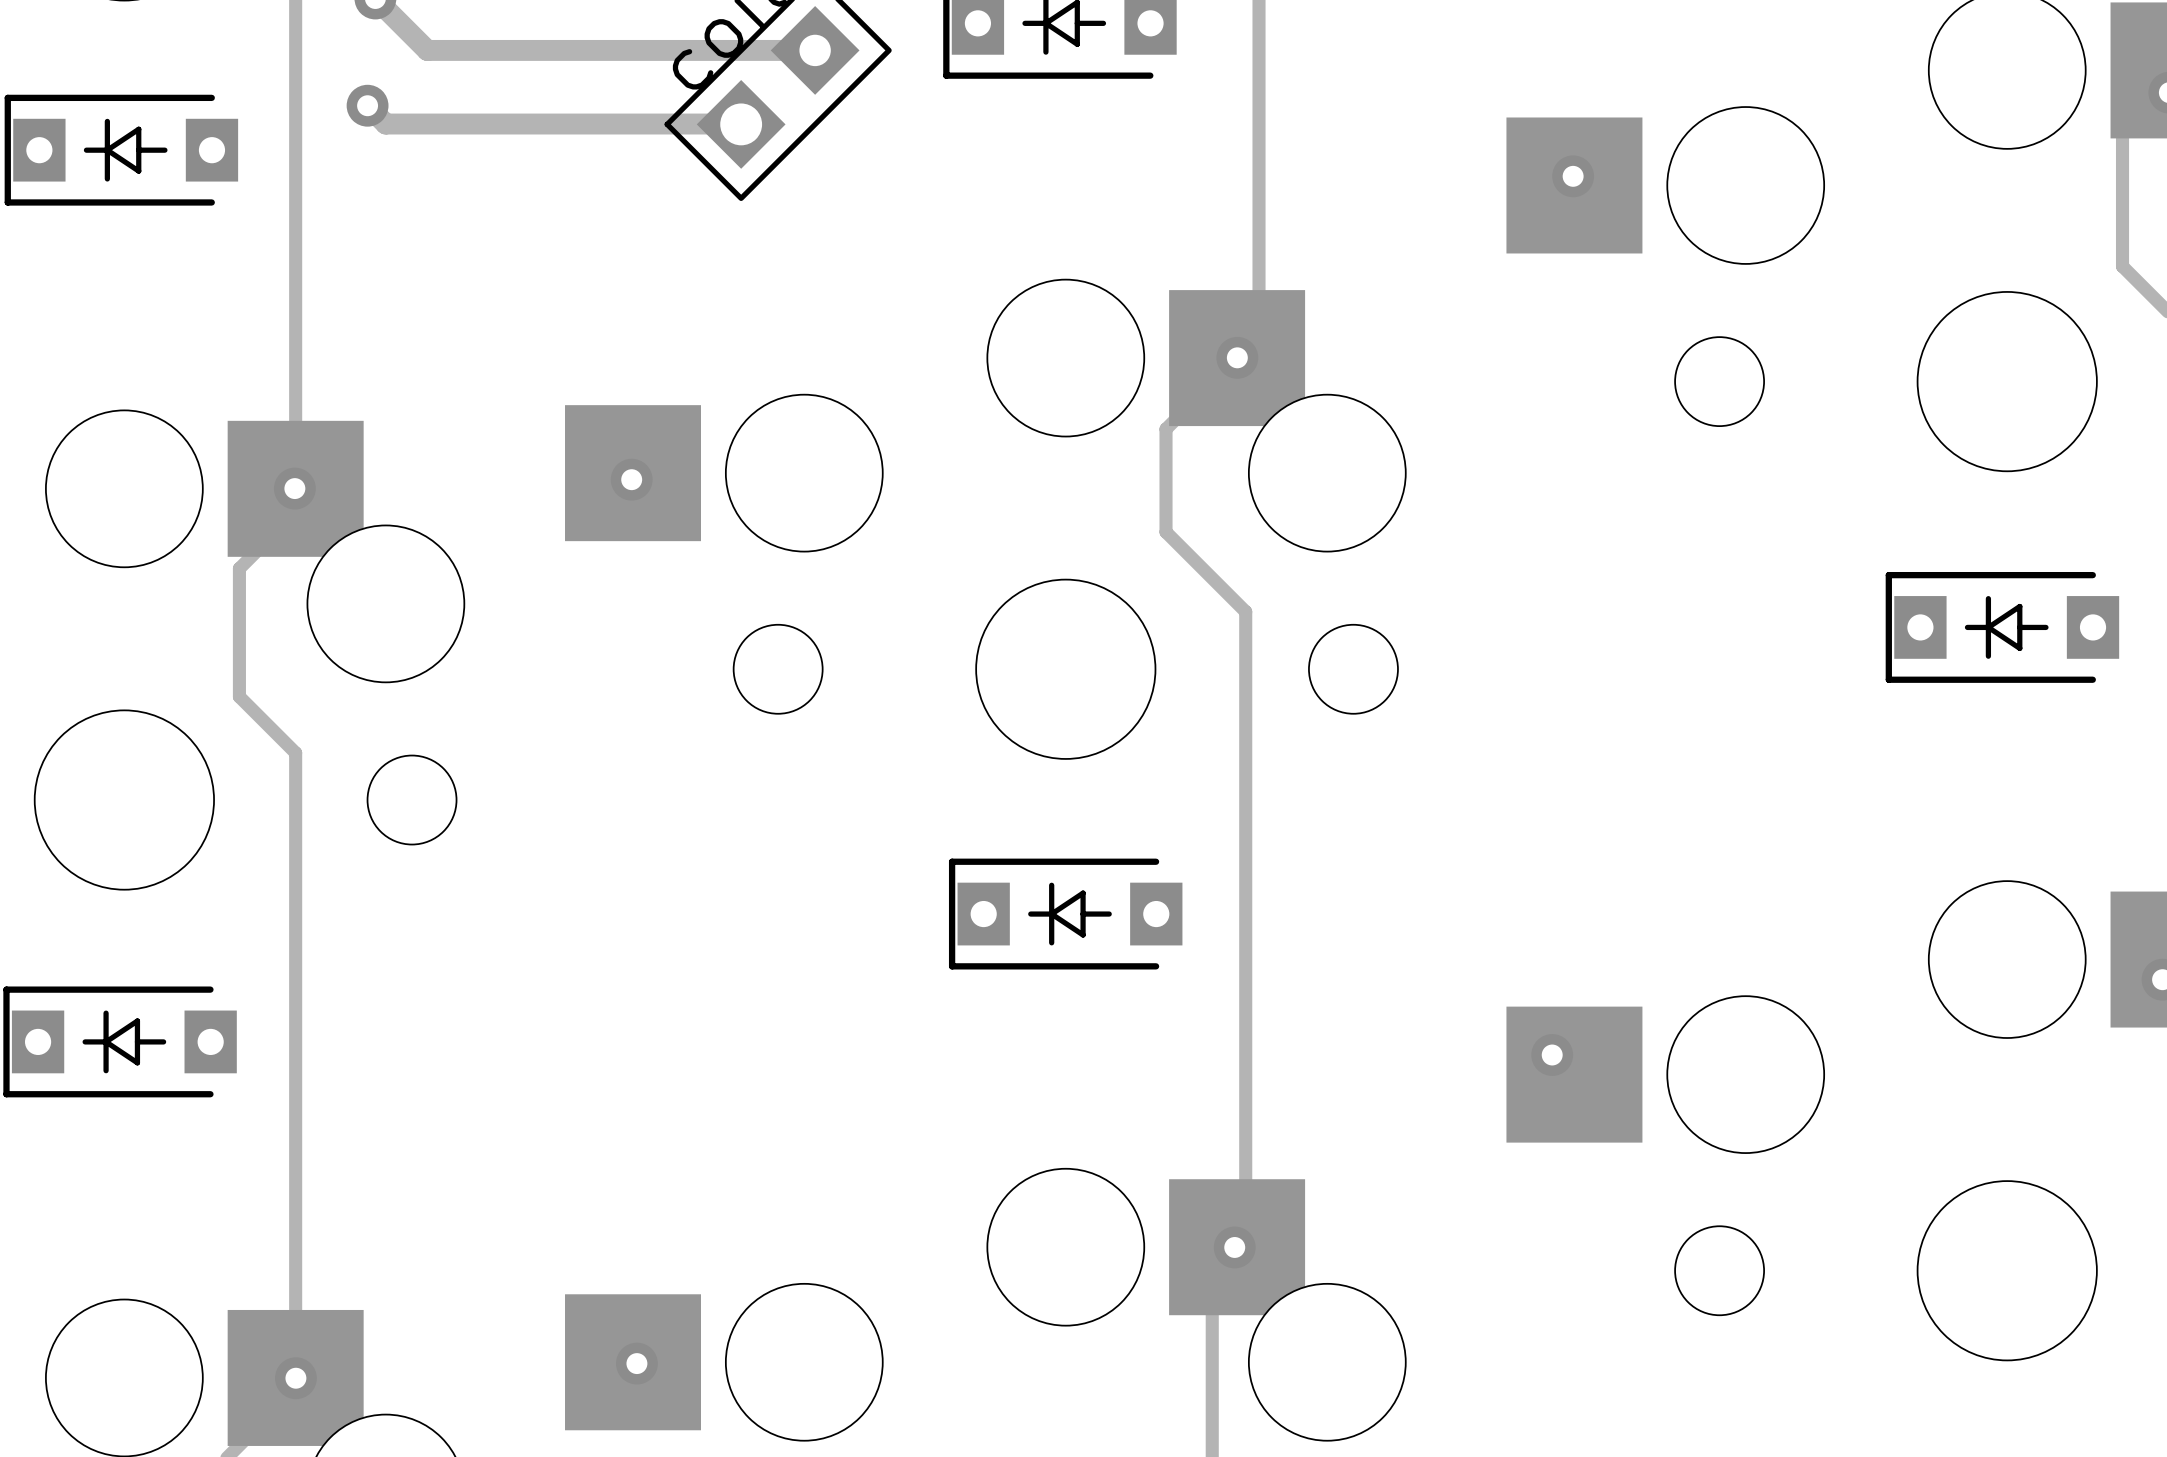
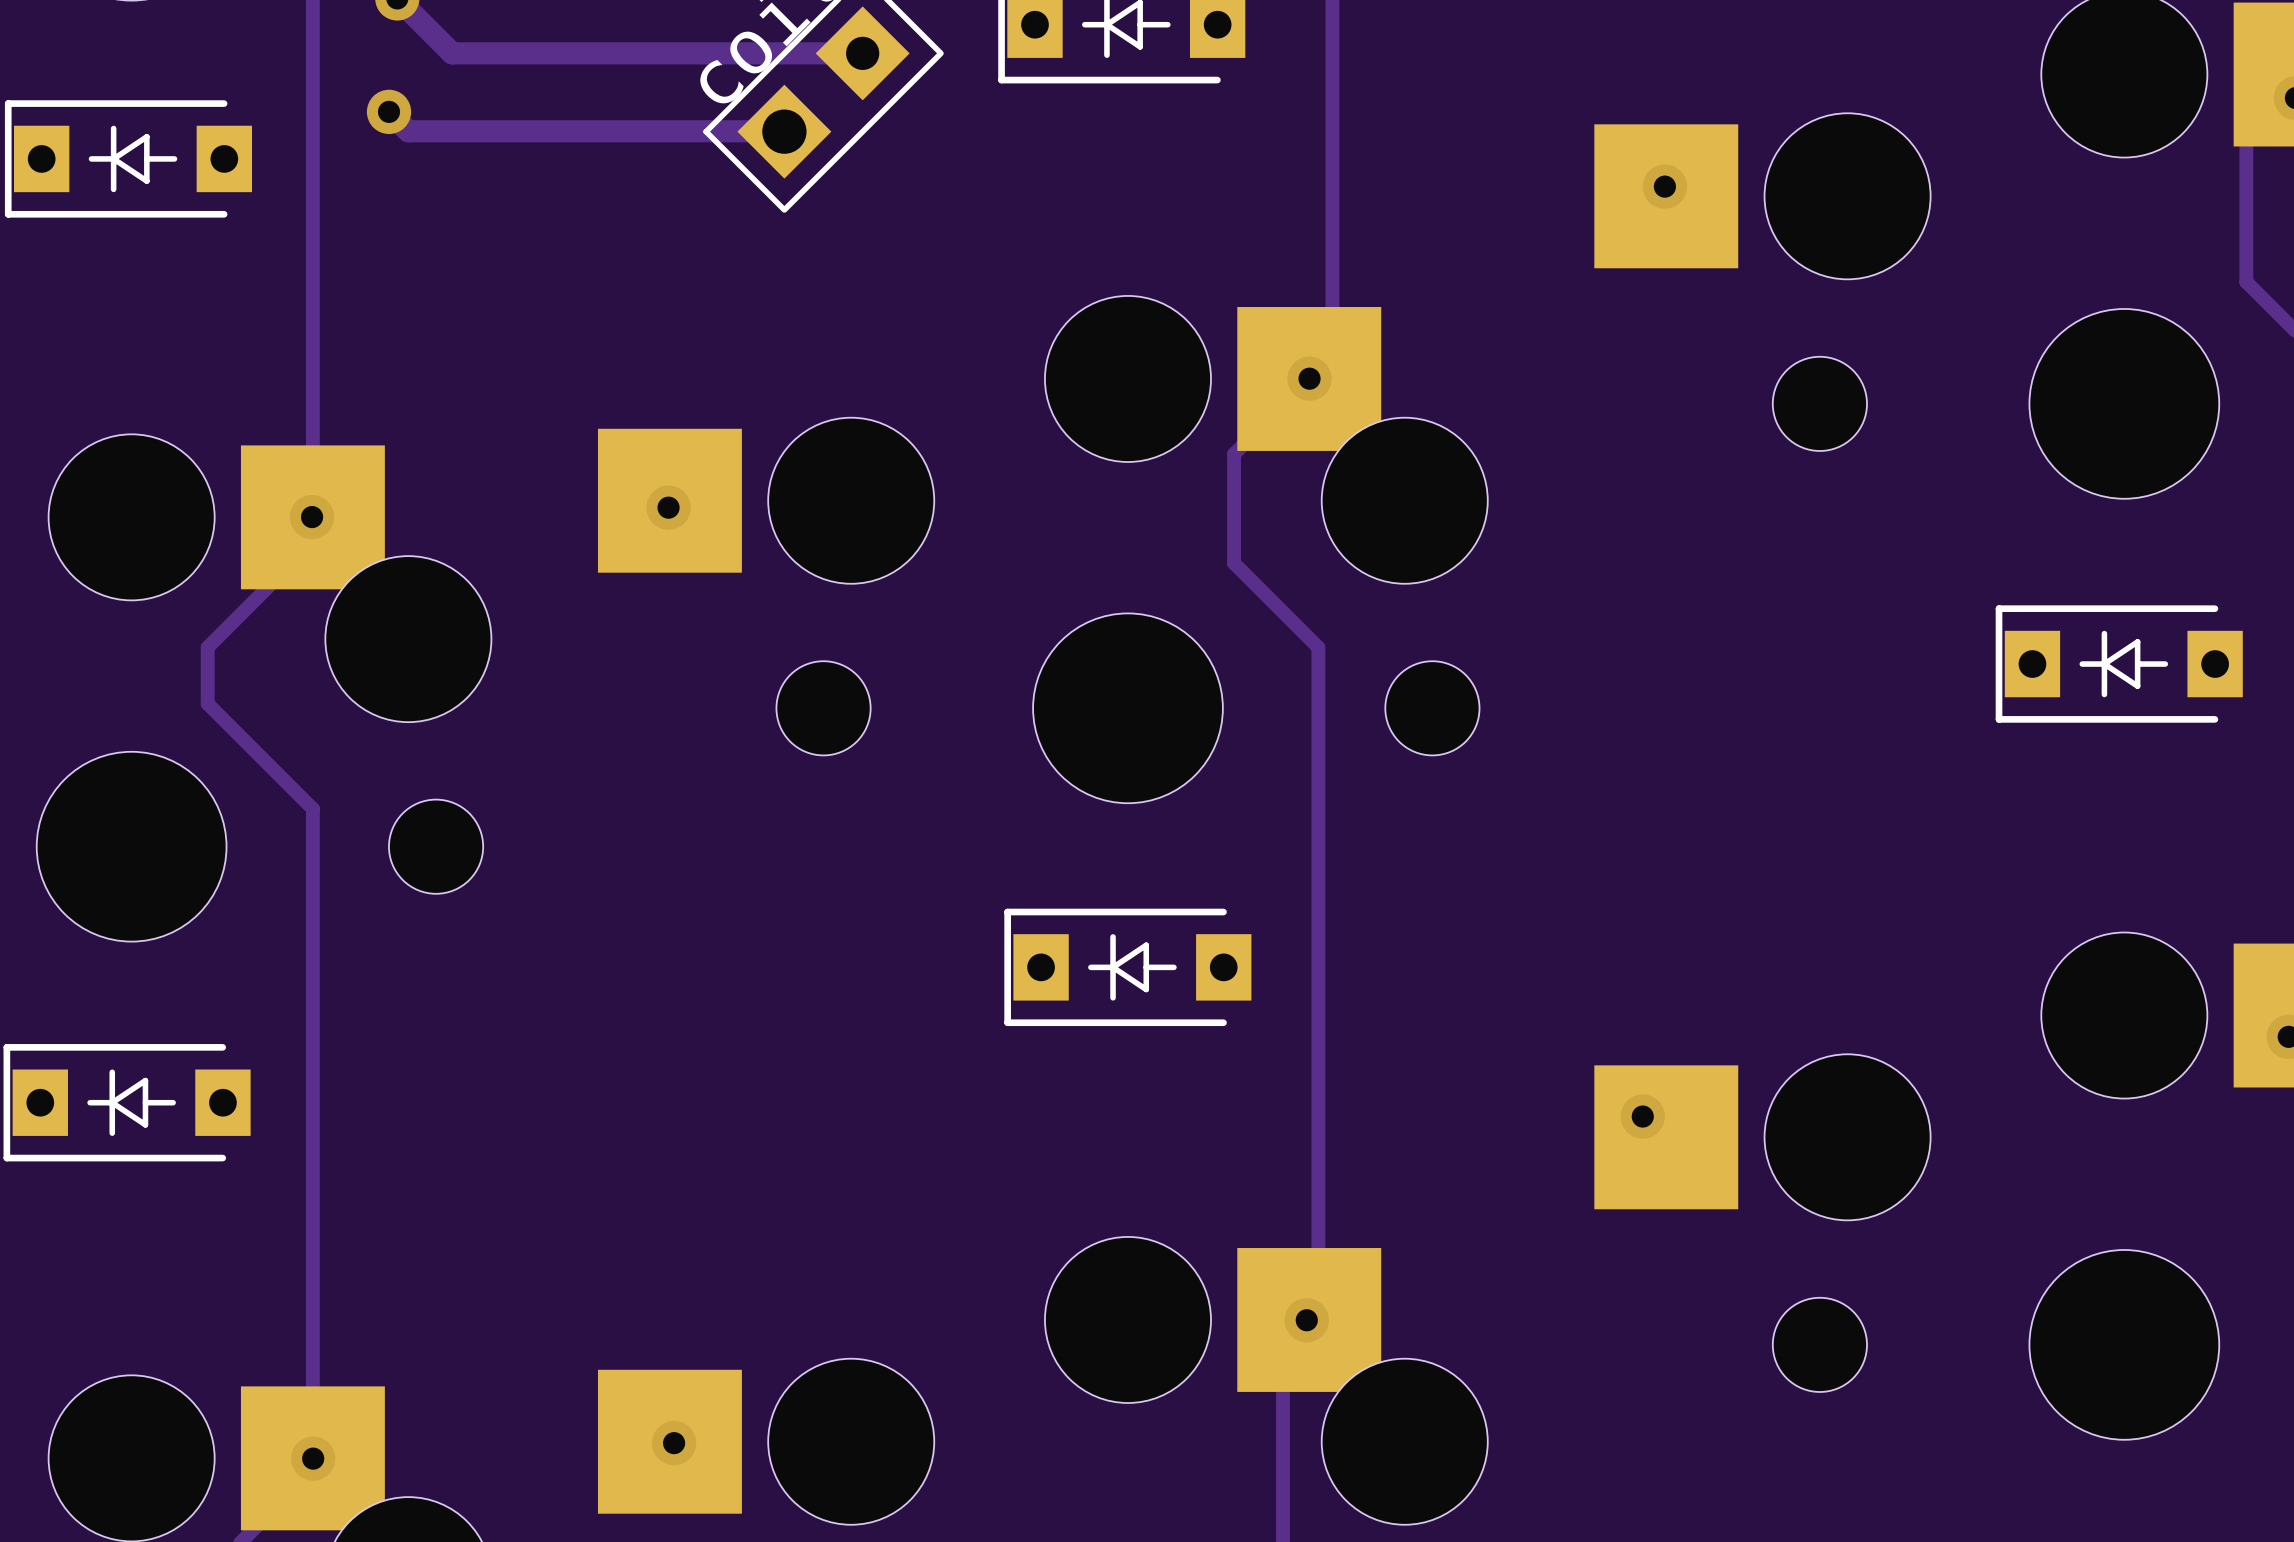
track: (239, 568) (239, 696) (295, 752) (295, 764) -> (253, 601) (207, 647) (207, 703) (312, 808)

